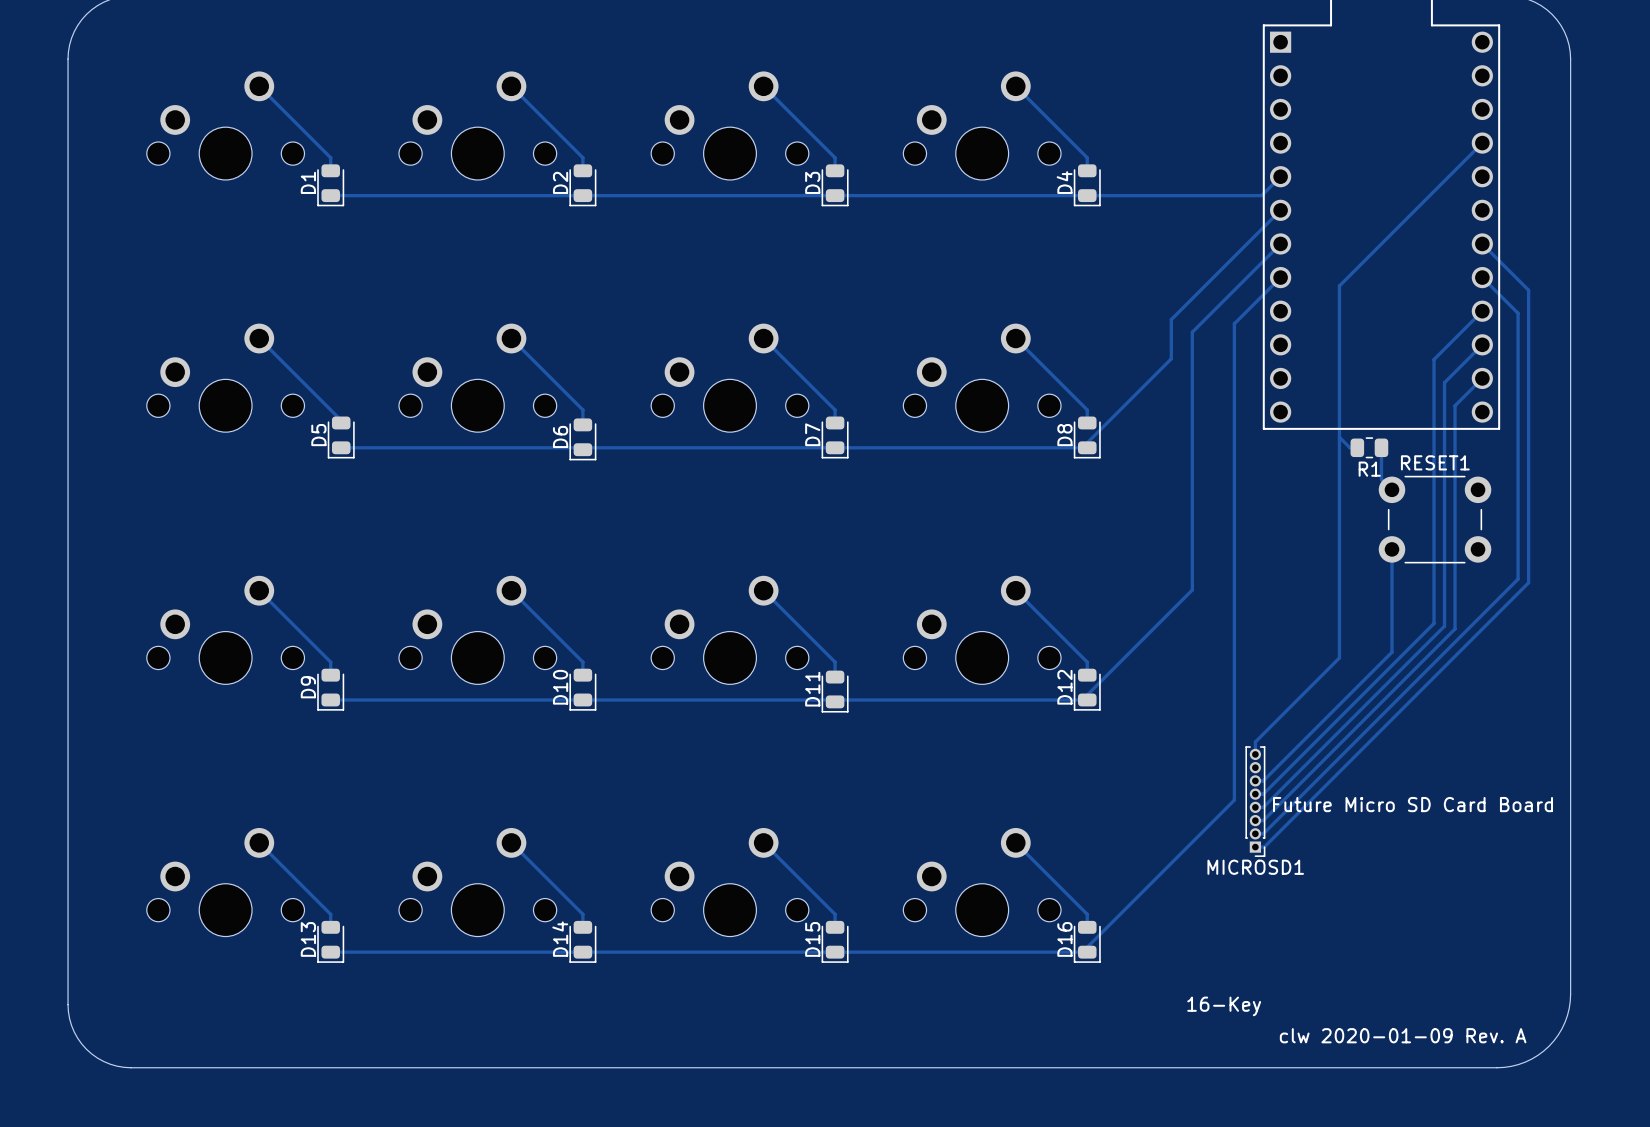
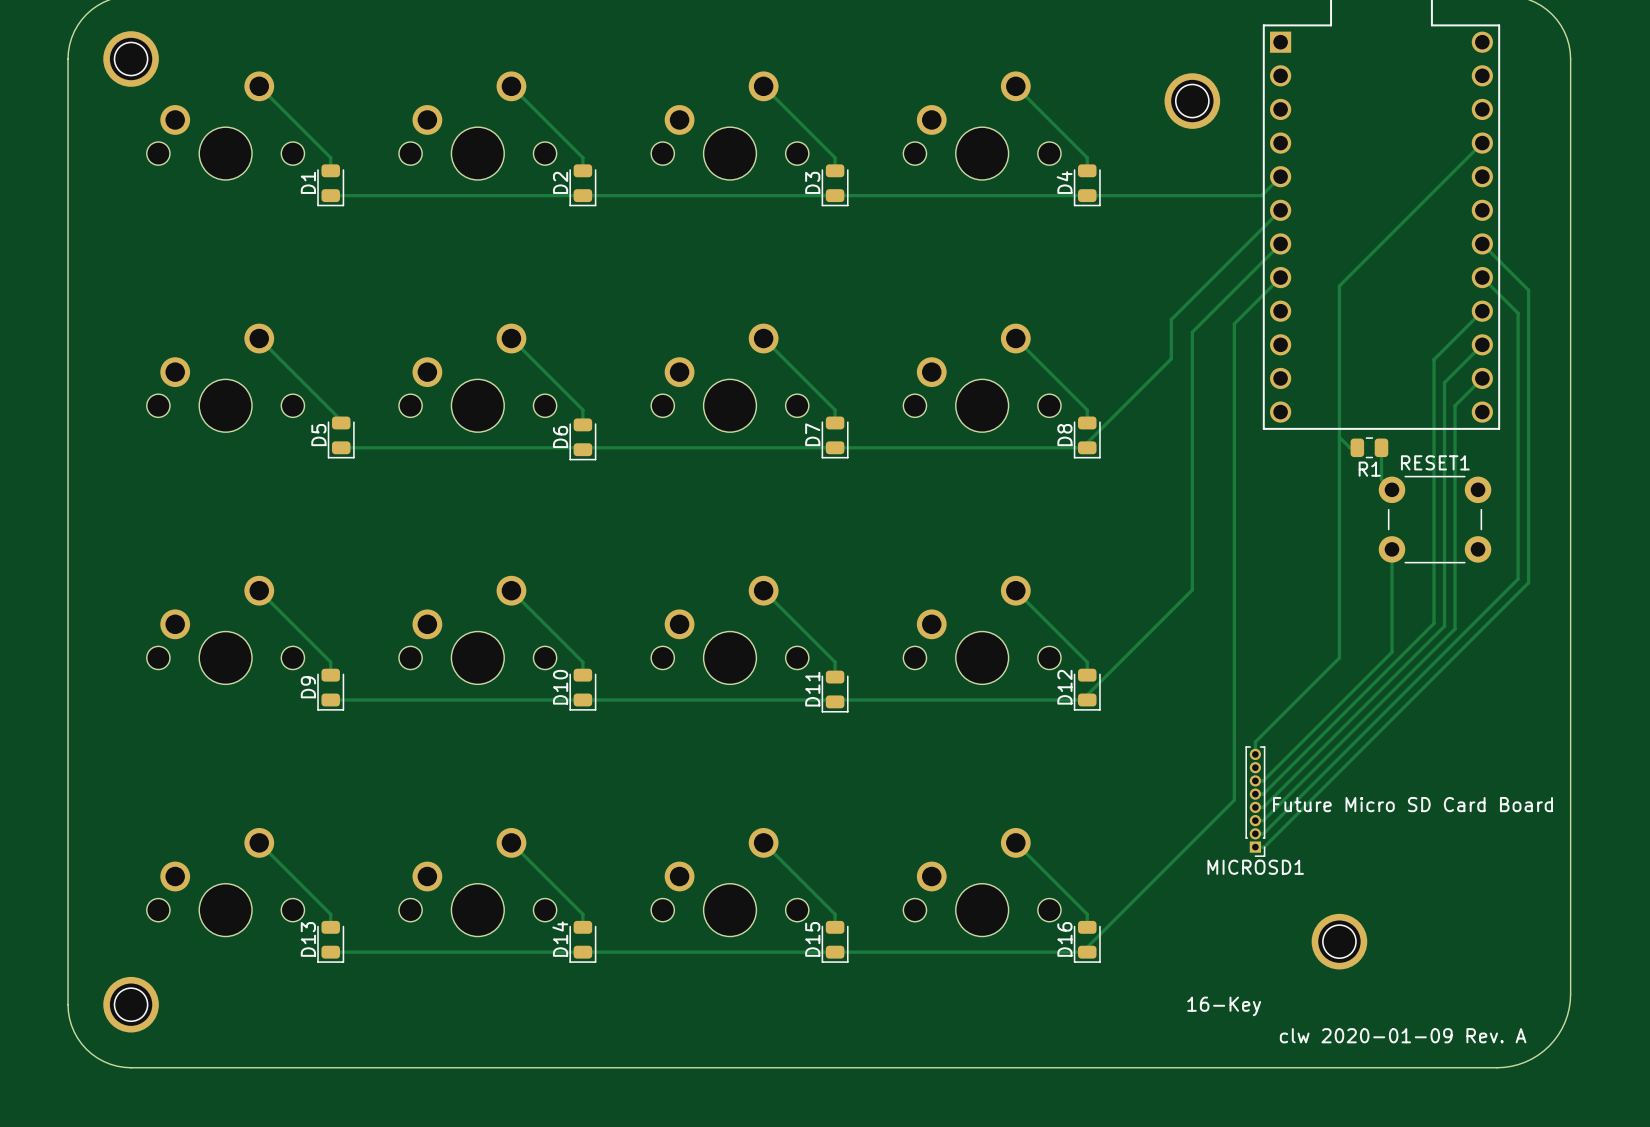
part: none -> (131, 59)
part: none -> (1192, 101)
part: none -> (1339, 941)
part: none -> (131, 1004)

